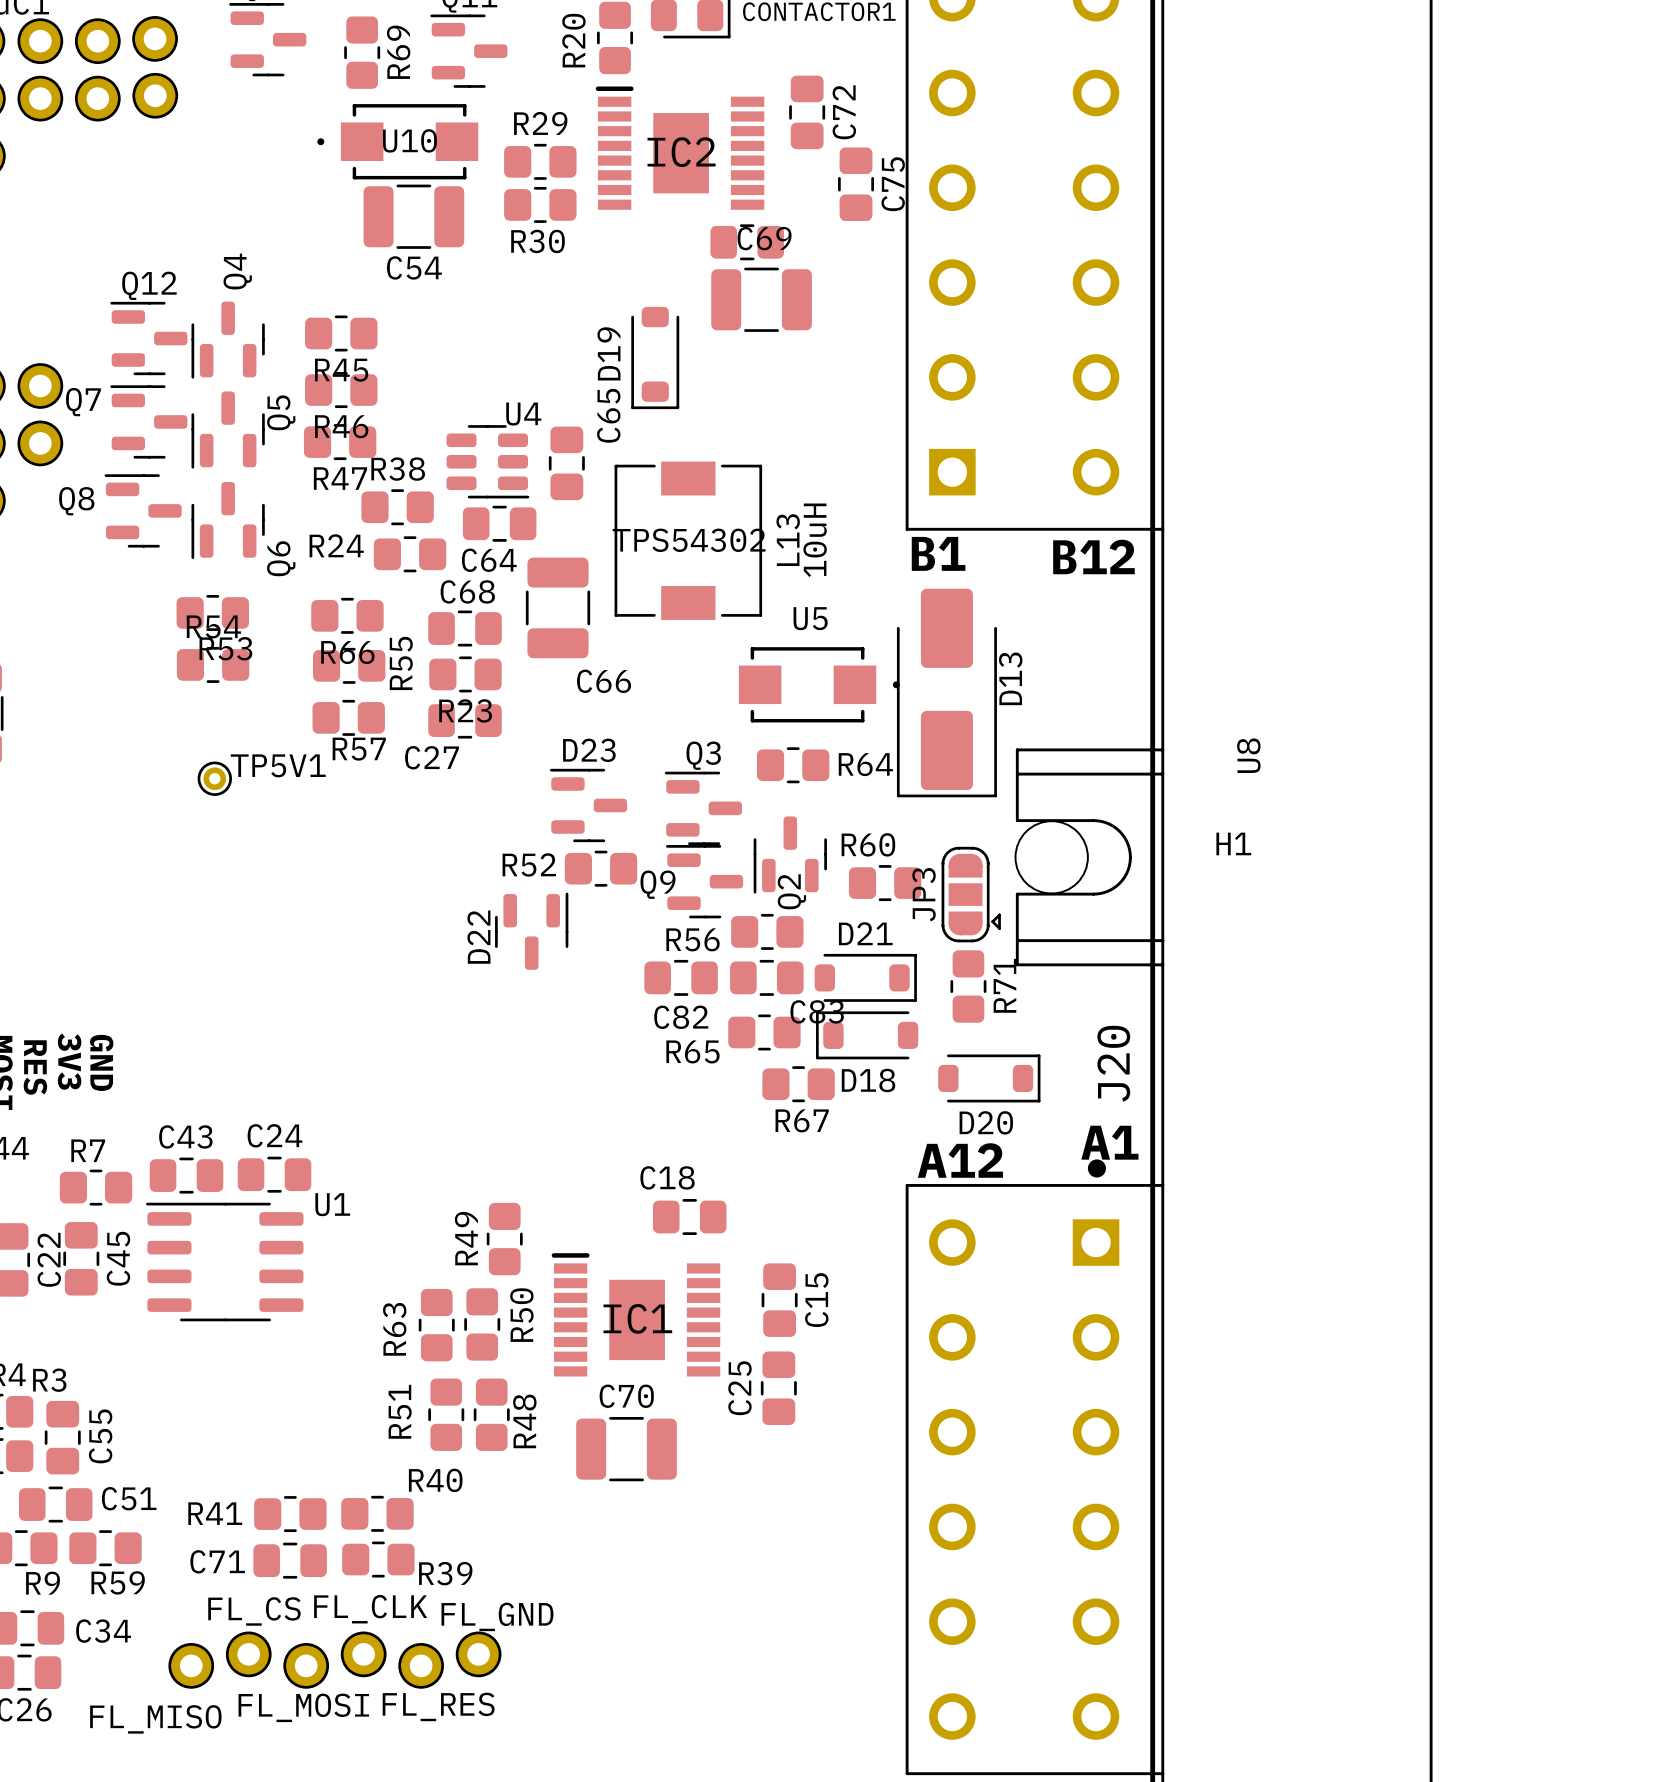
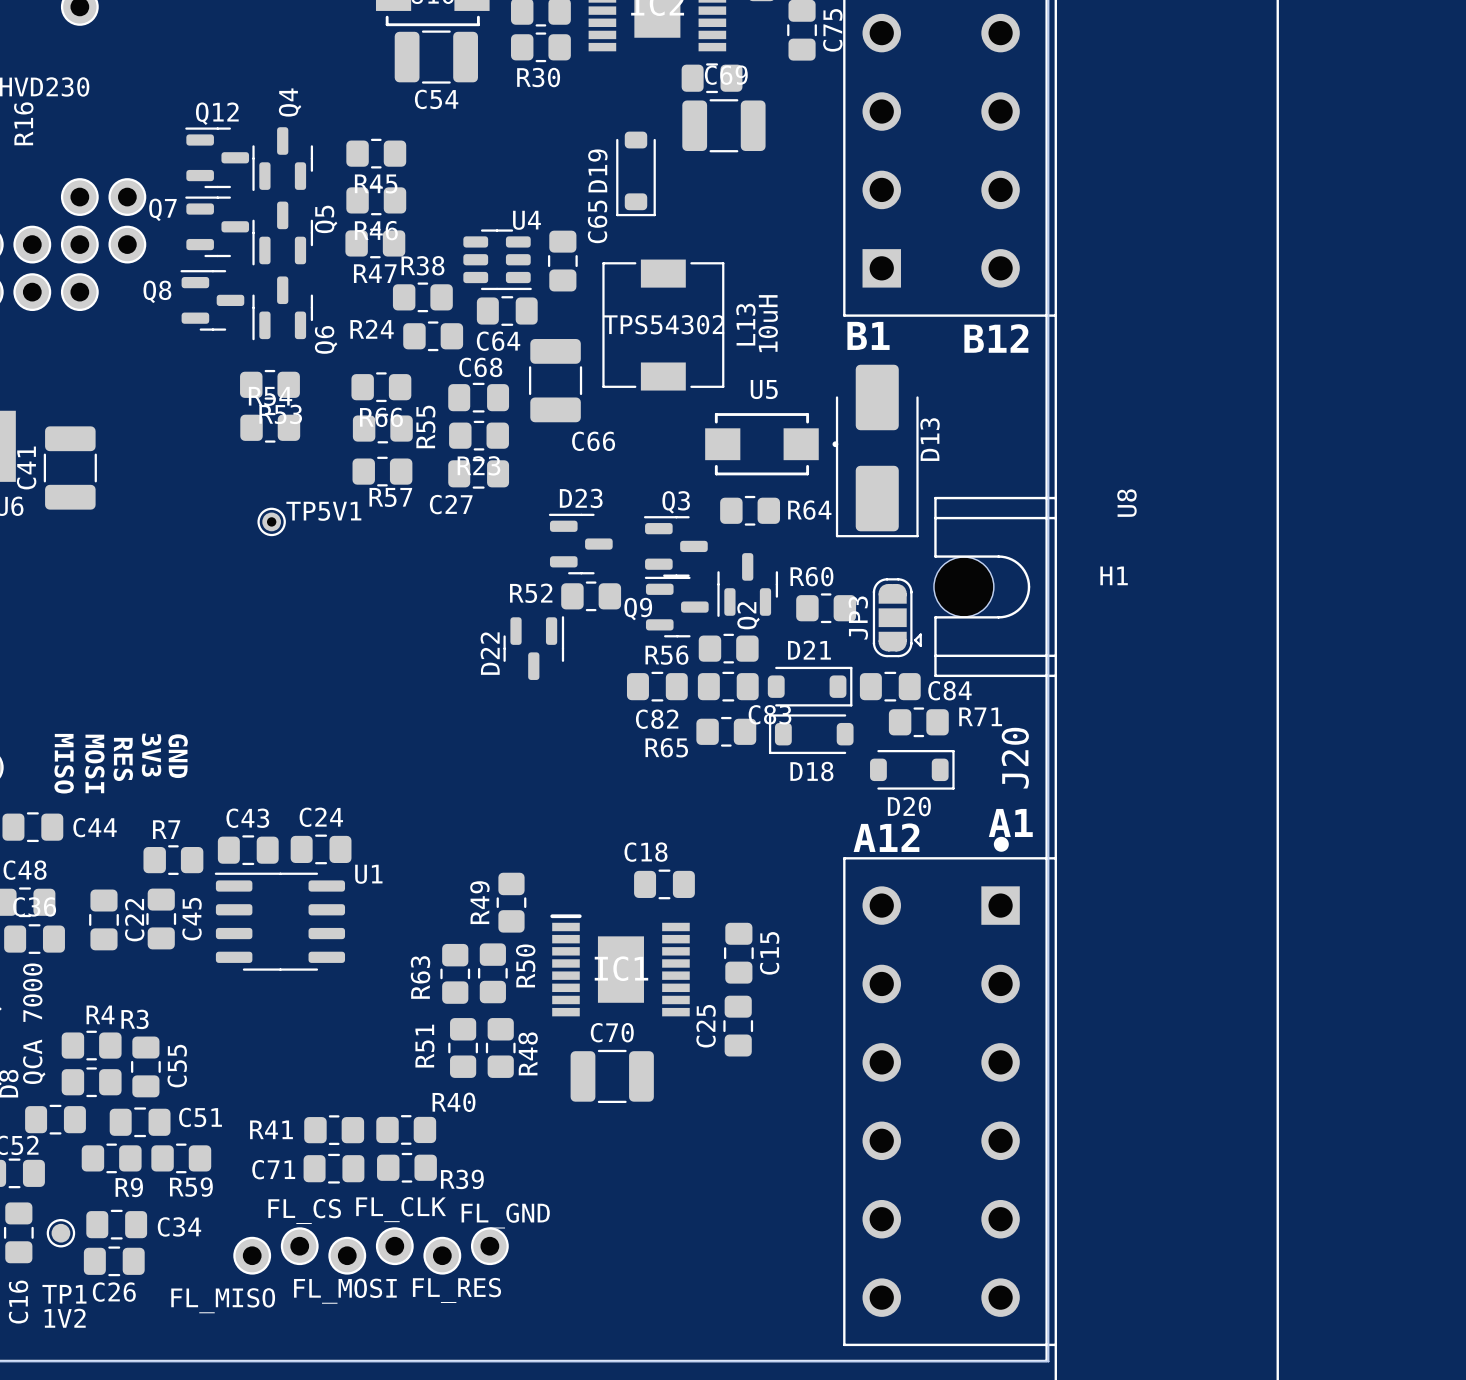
C84: none -> (890, 686)
R71 rotation: 0° (968, 986) -> 90° clockwise (918, 722)
R71 position: (968, 986) -> (918, 722)
R67: (798, 1084) -> none

